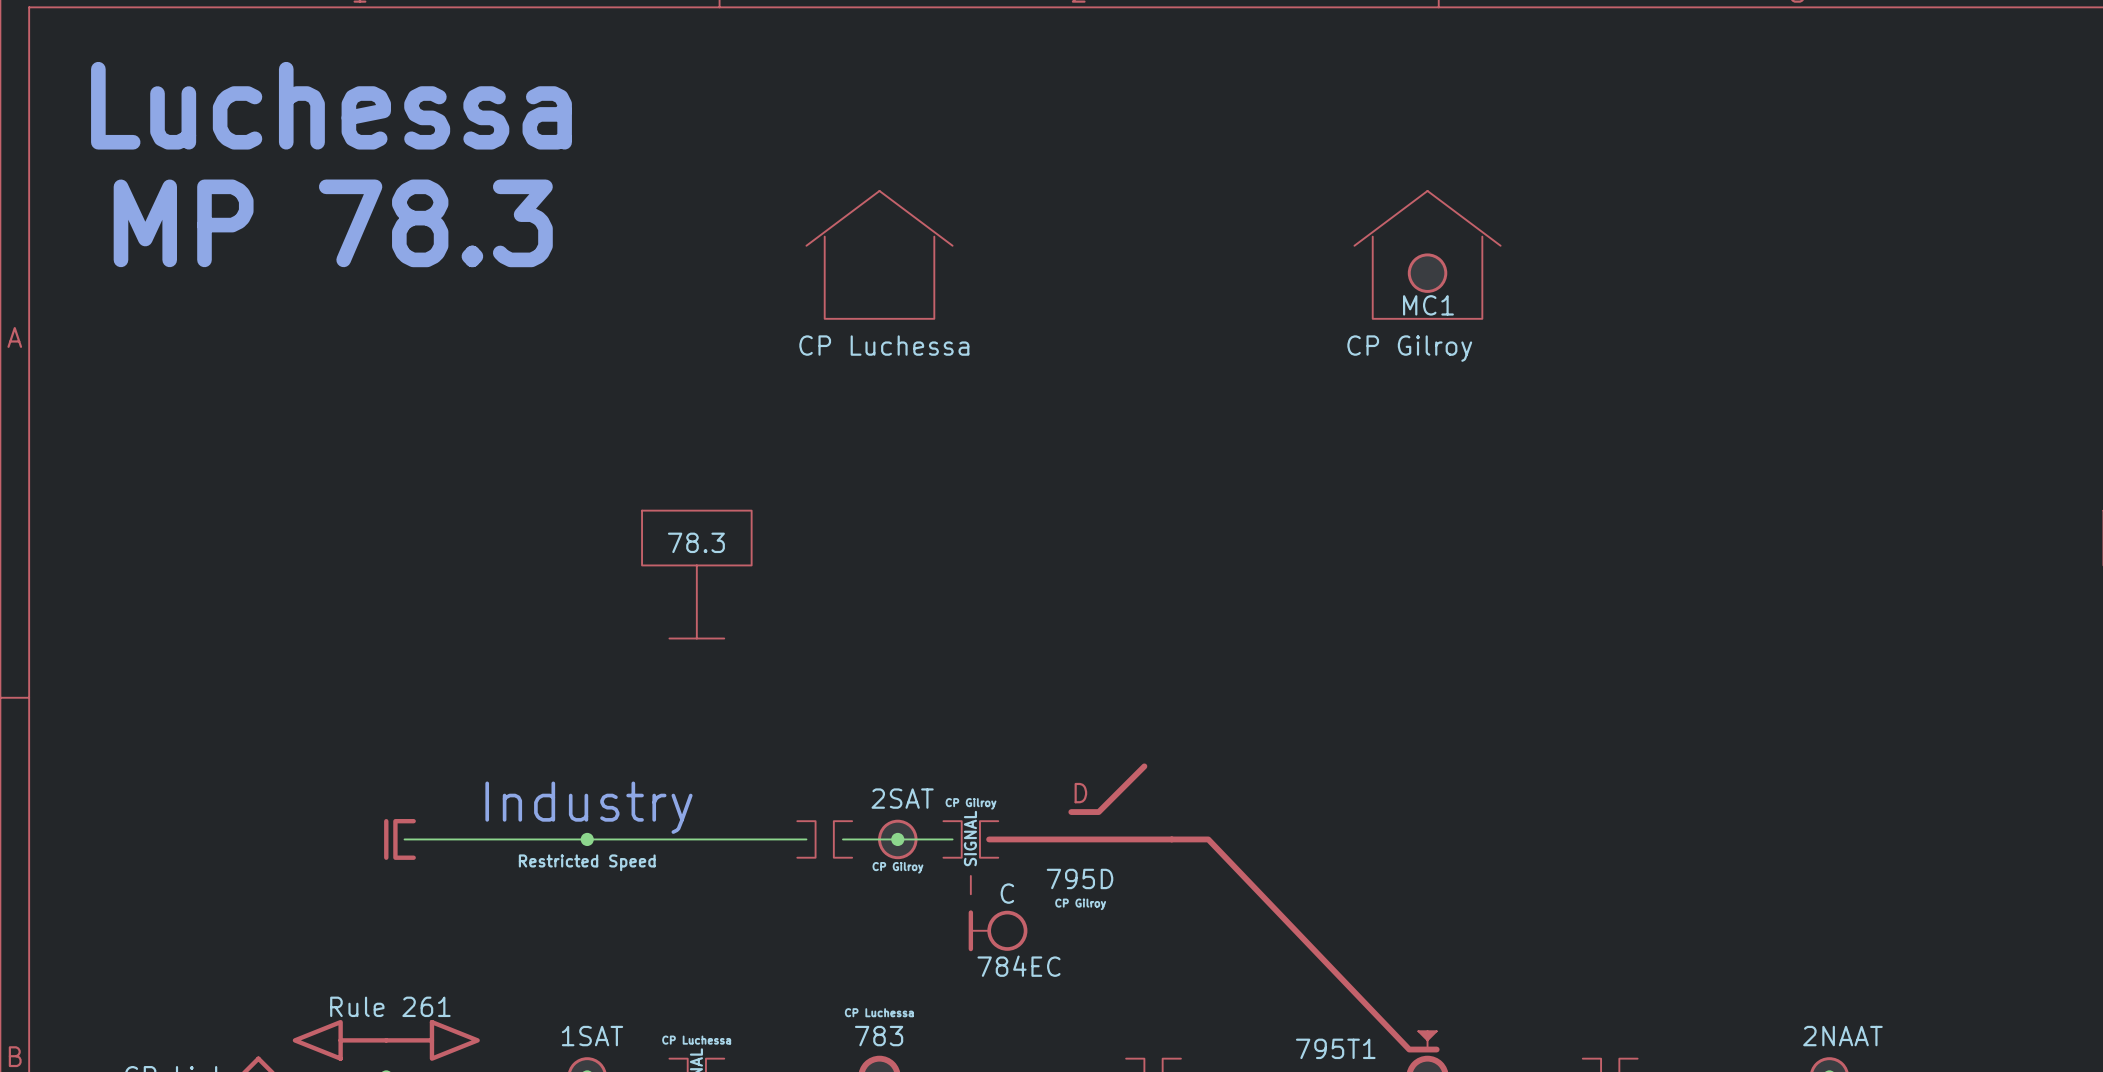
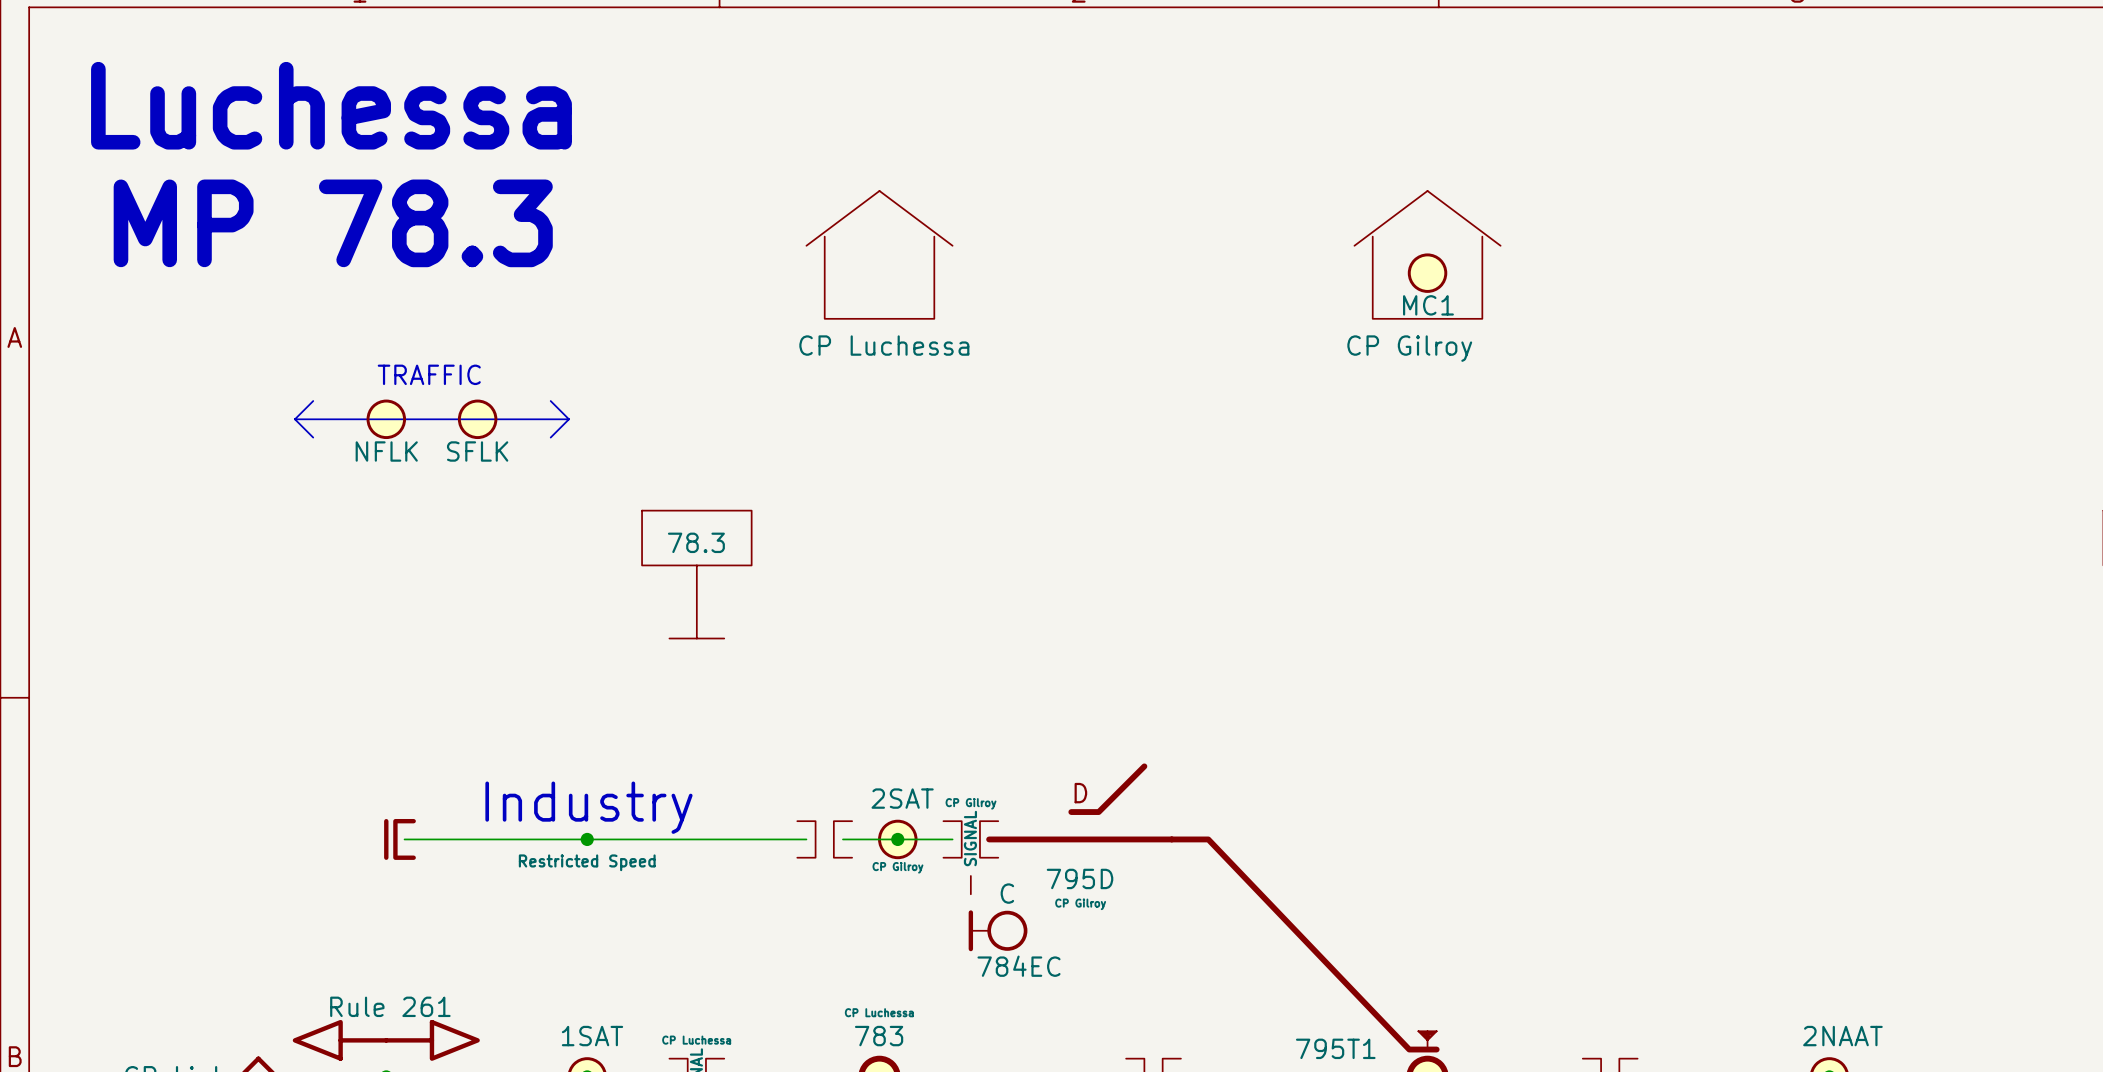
text: none -> TRAFFIC (429, 374)
line: none -> (313, 401) (294, 419)
line: none -> (550, 401) (568, 419)
line: none -> (294, 419) (568, 419)
line: none -> (294, 419) (313, 437)
part: none -> NFLK (386, 419)
part: none -> SFLK (477, 419)
line: none -> (568, 419) (550, 437)

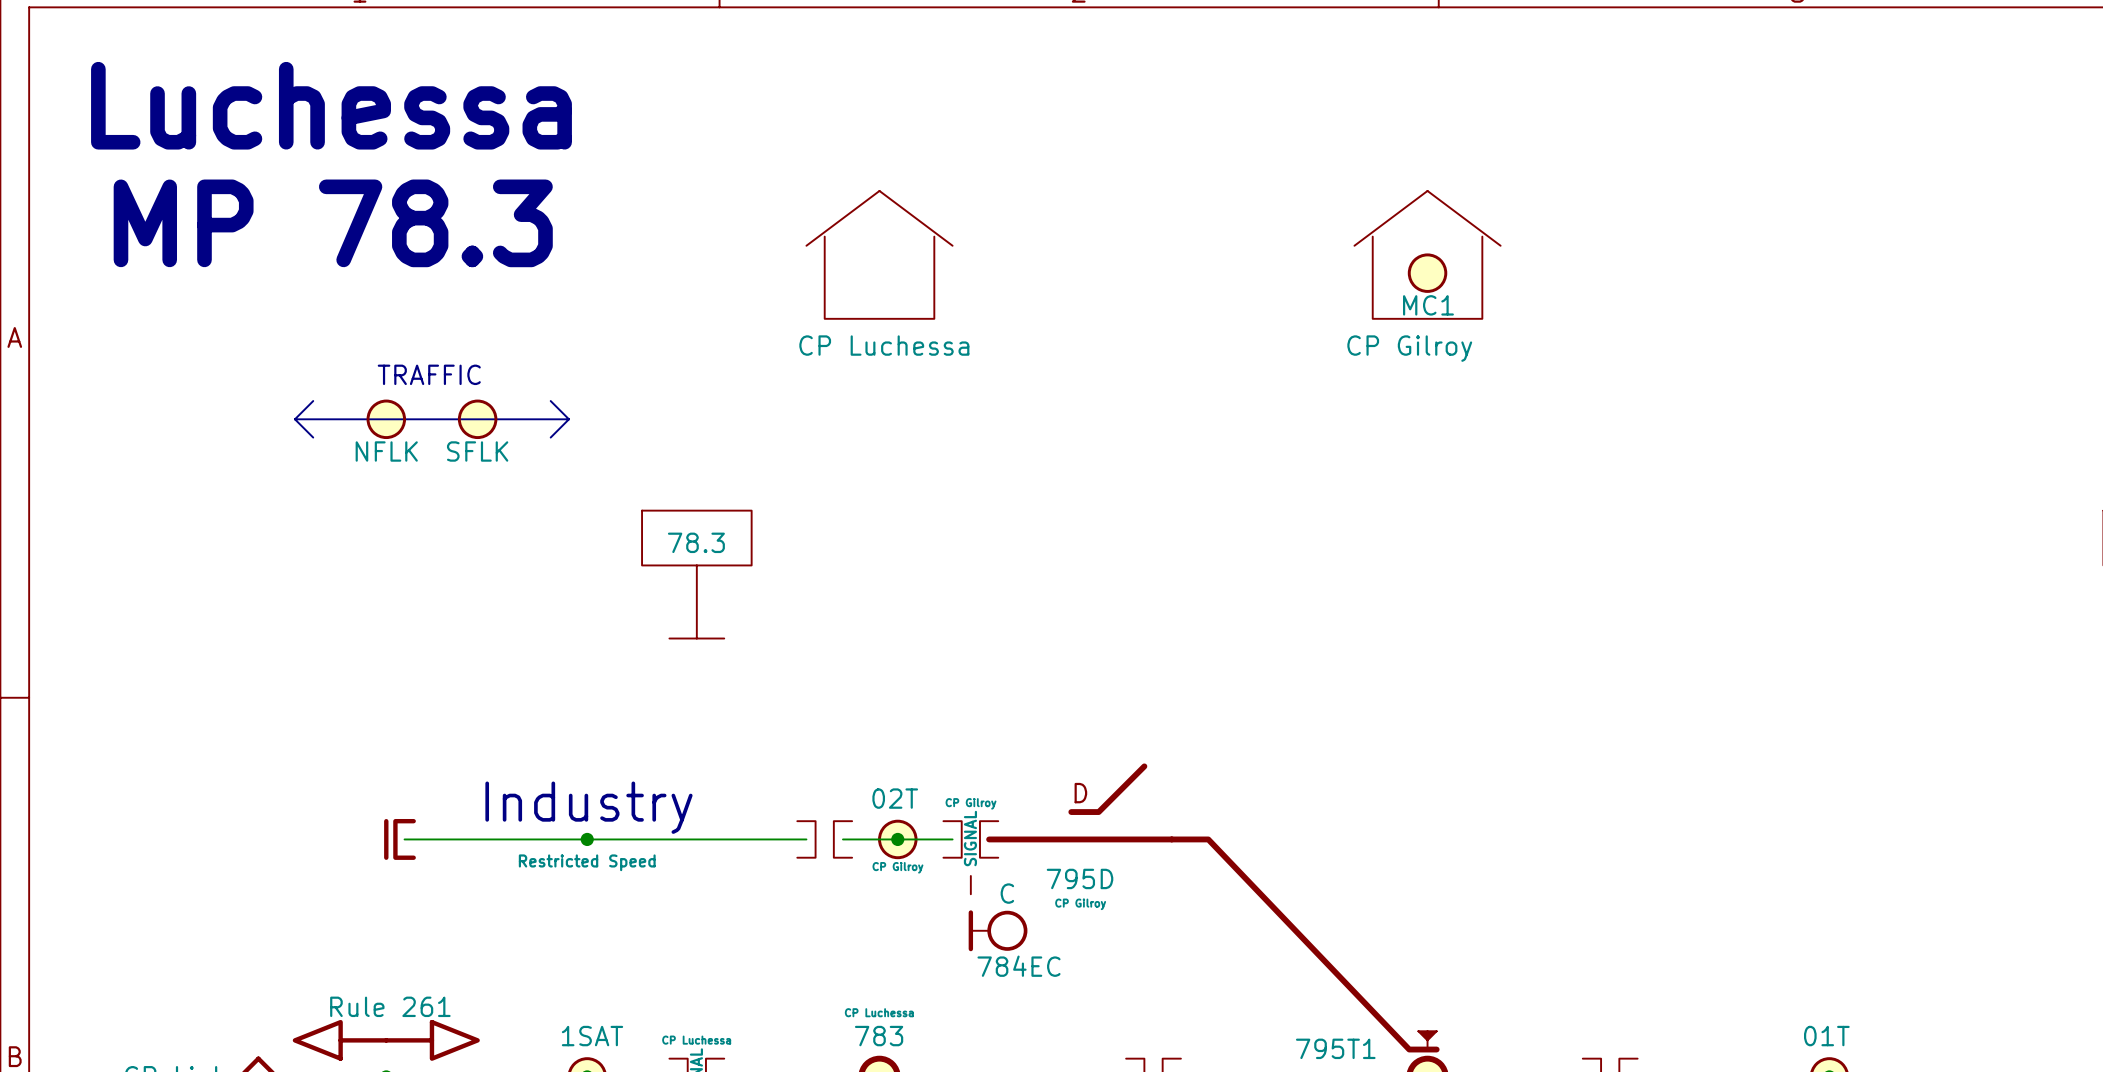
part value: 2SAT (902, 798) -> 02T (895, 798)
part value: 2NAAT (1842, 1036) -> 01T (1826, 1036)

